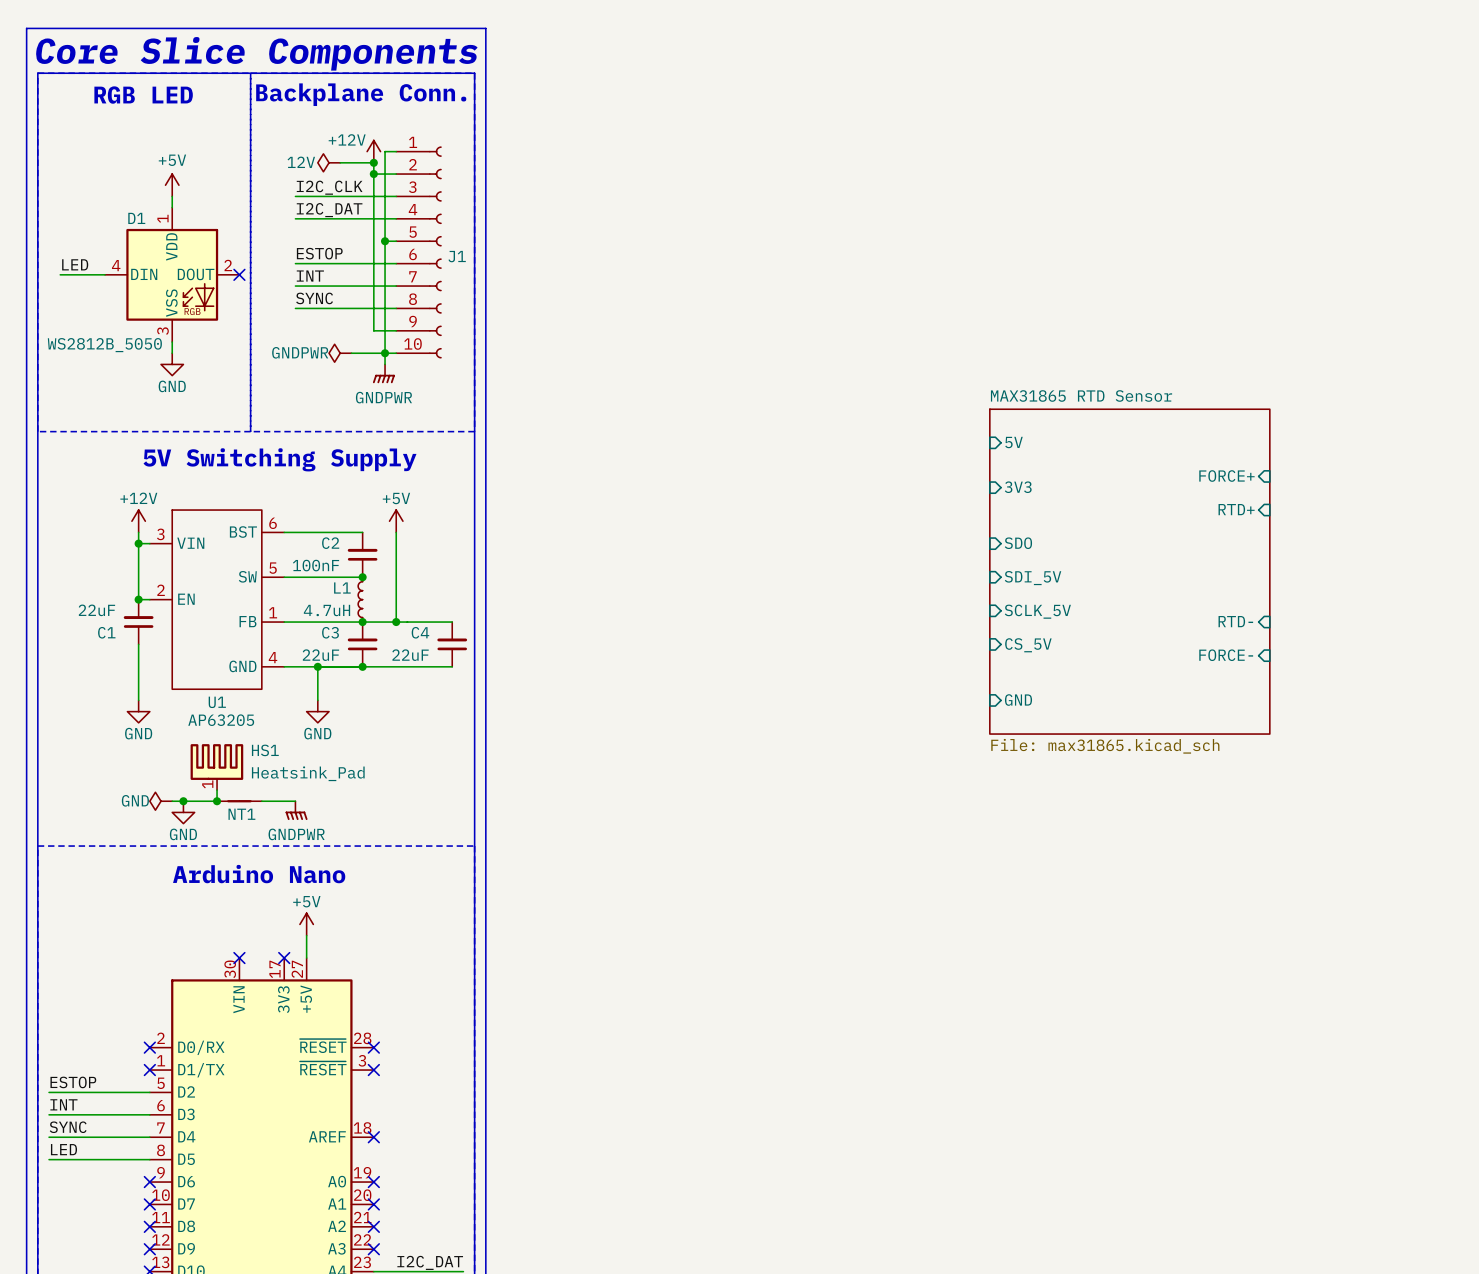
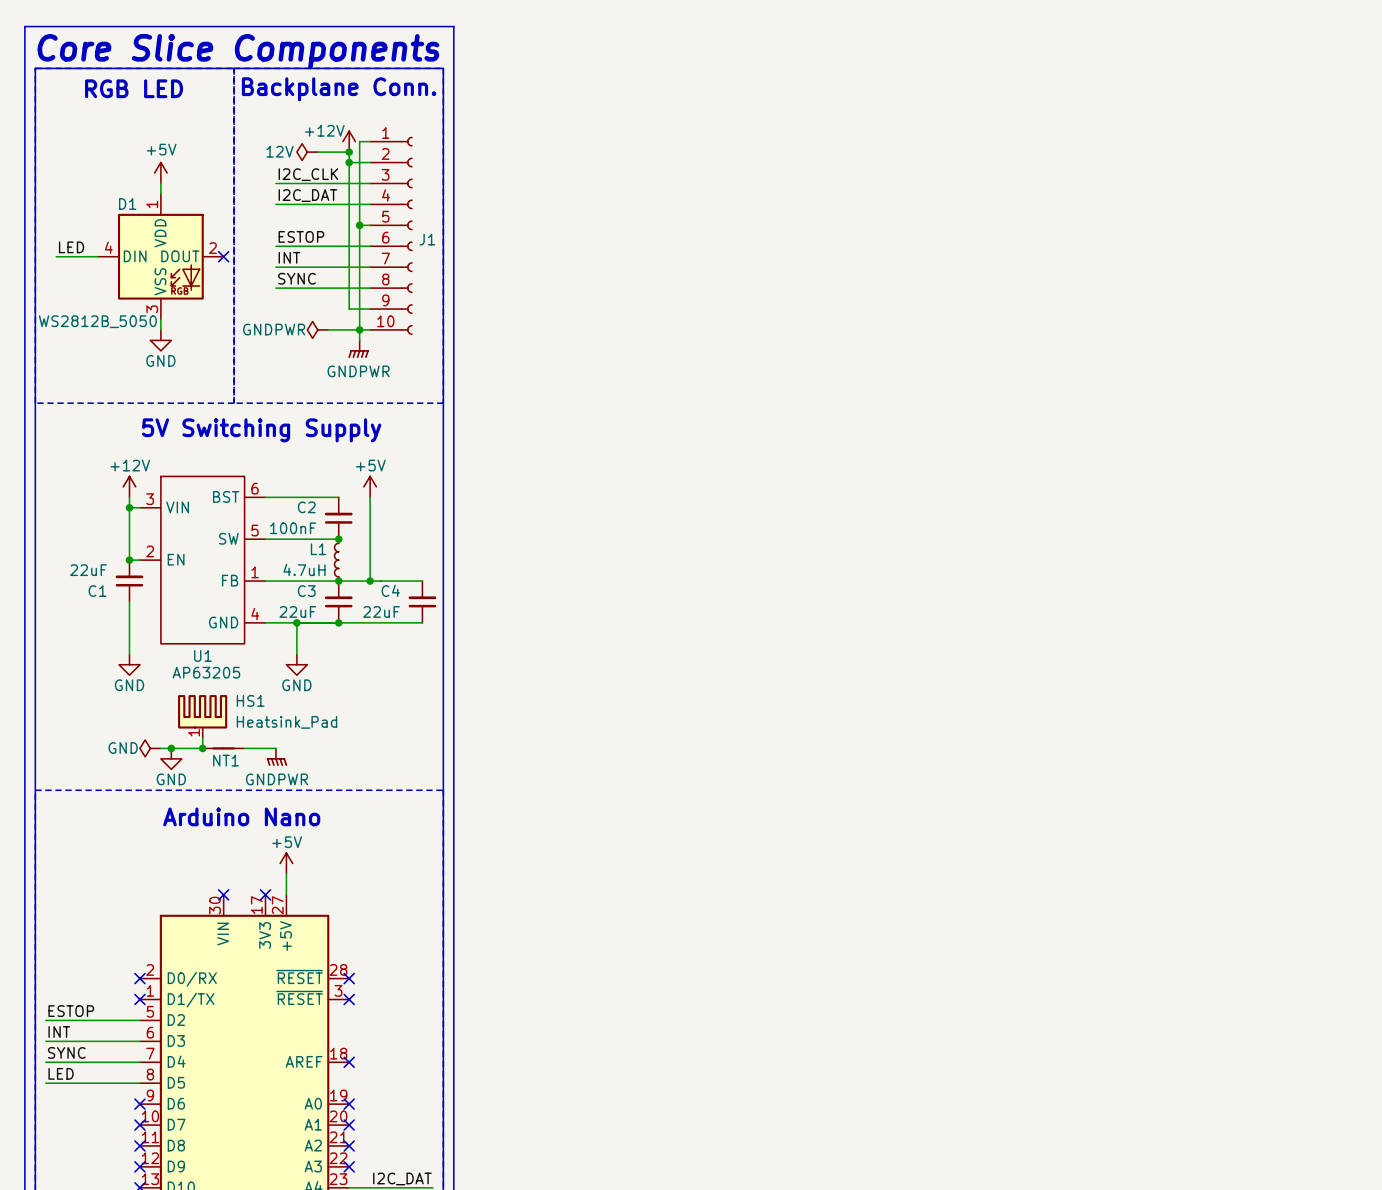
sheet pin: 5V (1013, 442) -> none
sheet pin: FORCE+ (1226, 476) -> none
sheet pin: 3V3 (1018, 487) -> none
sheet pin: RTD+ (1236, 509) -> none
sheet pin: SDO (1018, 543) -> none
sheet MAX31865 RTD Sensor: File: max31865.kicad_sch (1129, 571) -> none
sheet pin: SDI_5V (1033, 578) -> none
sheet pin: SCLK_5V (1037, 611) -> none
sheet pin: RTD- (1235, 621) -> none
sheet pin: CS_5V (1028, 645) -> none
sheet pin: FORCE- (1226, 655) -> none
sheet pin: GND (1018, 700) -> none

